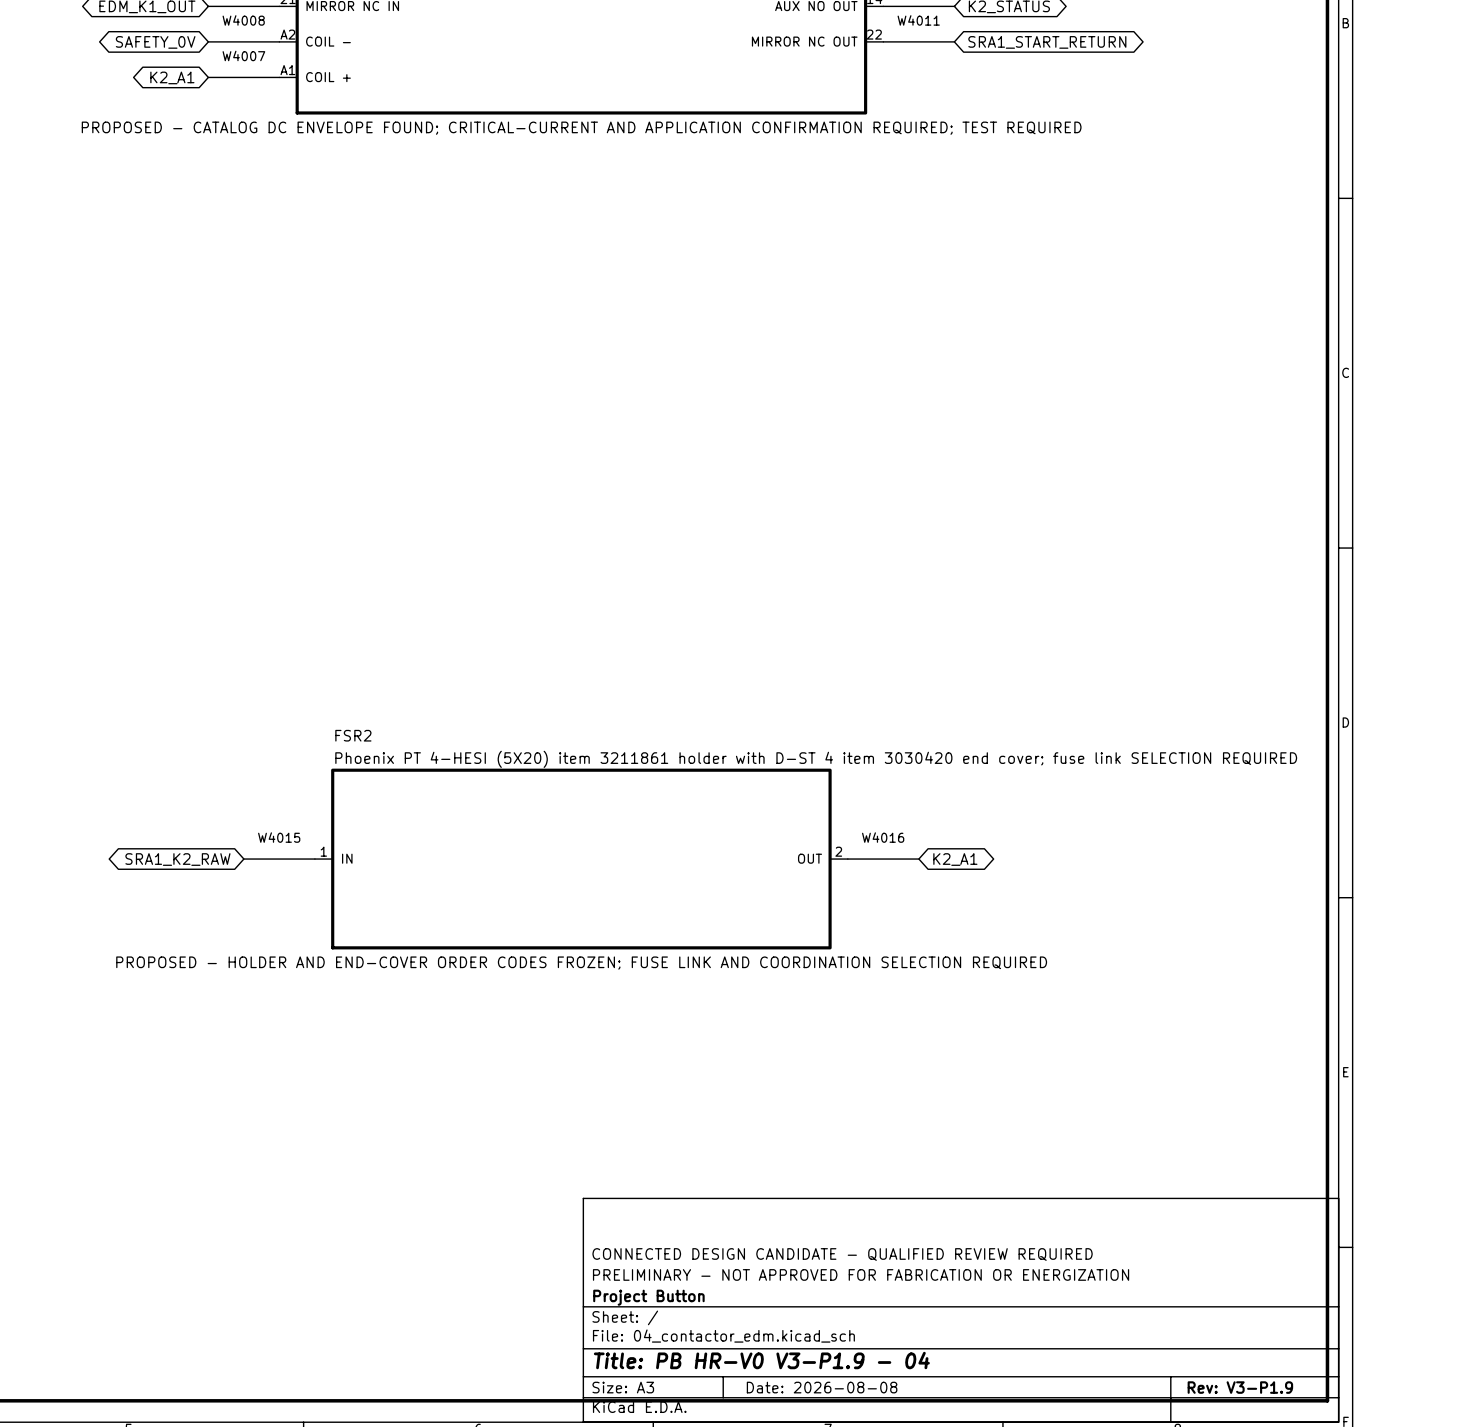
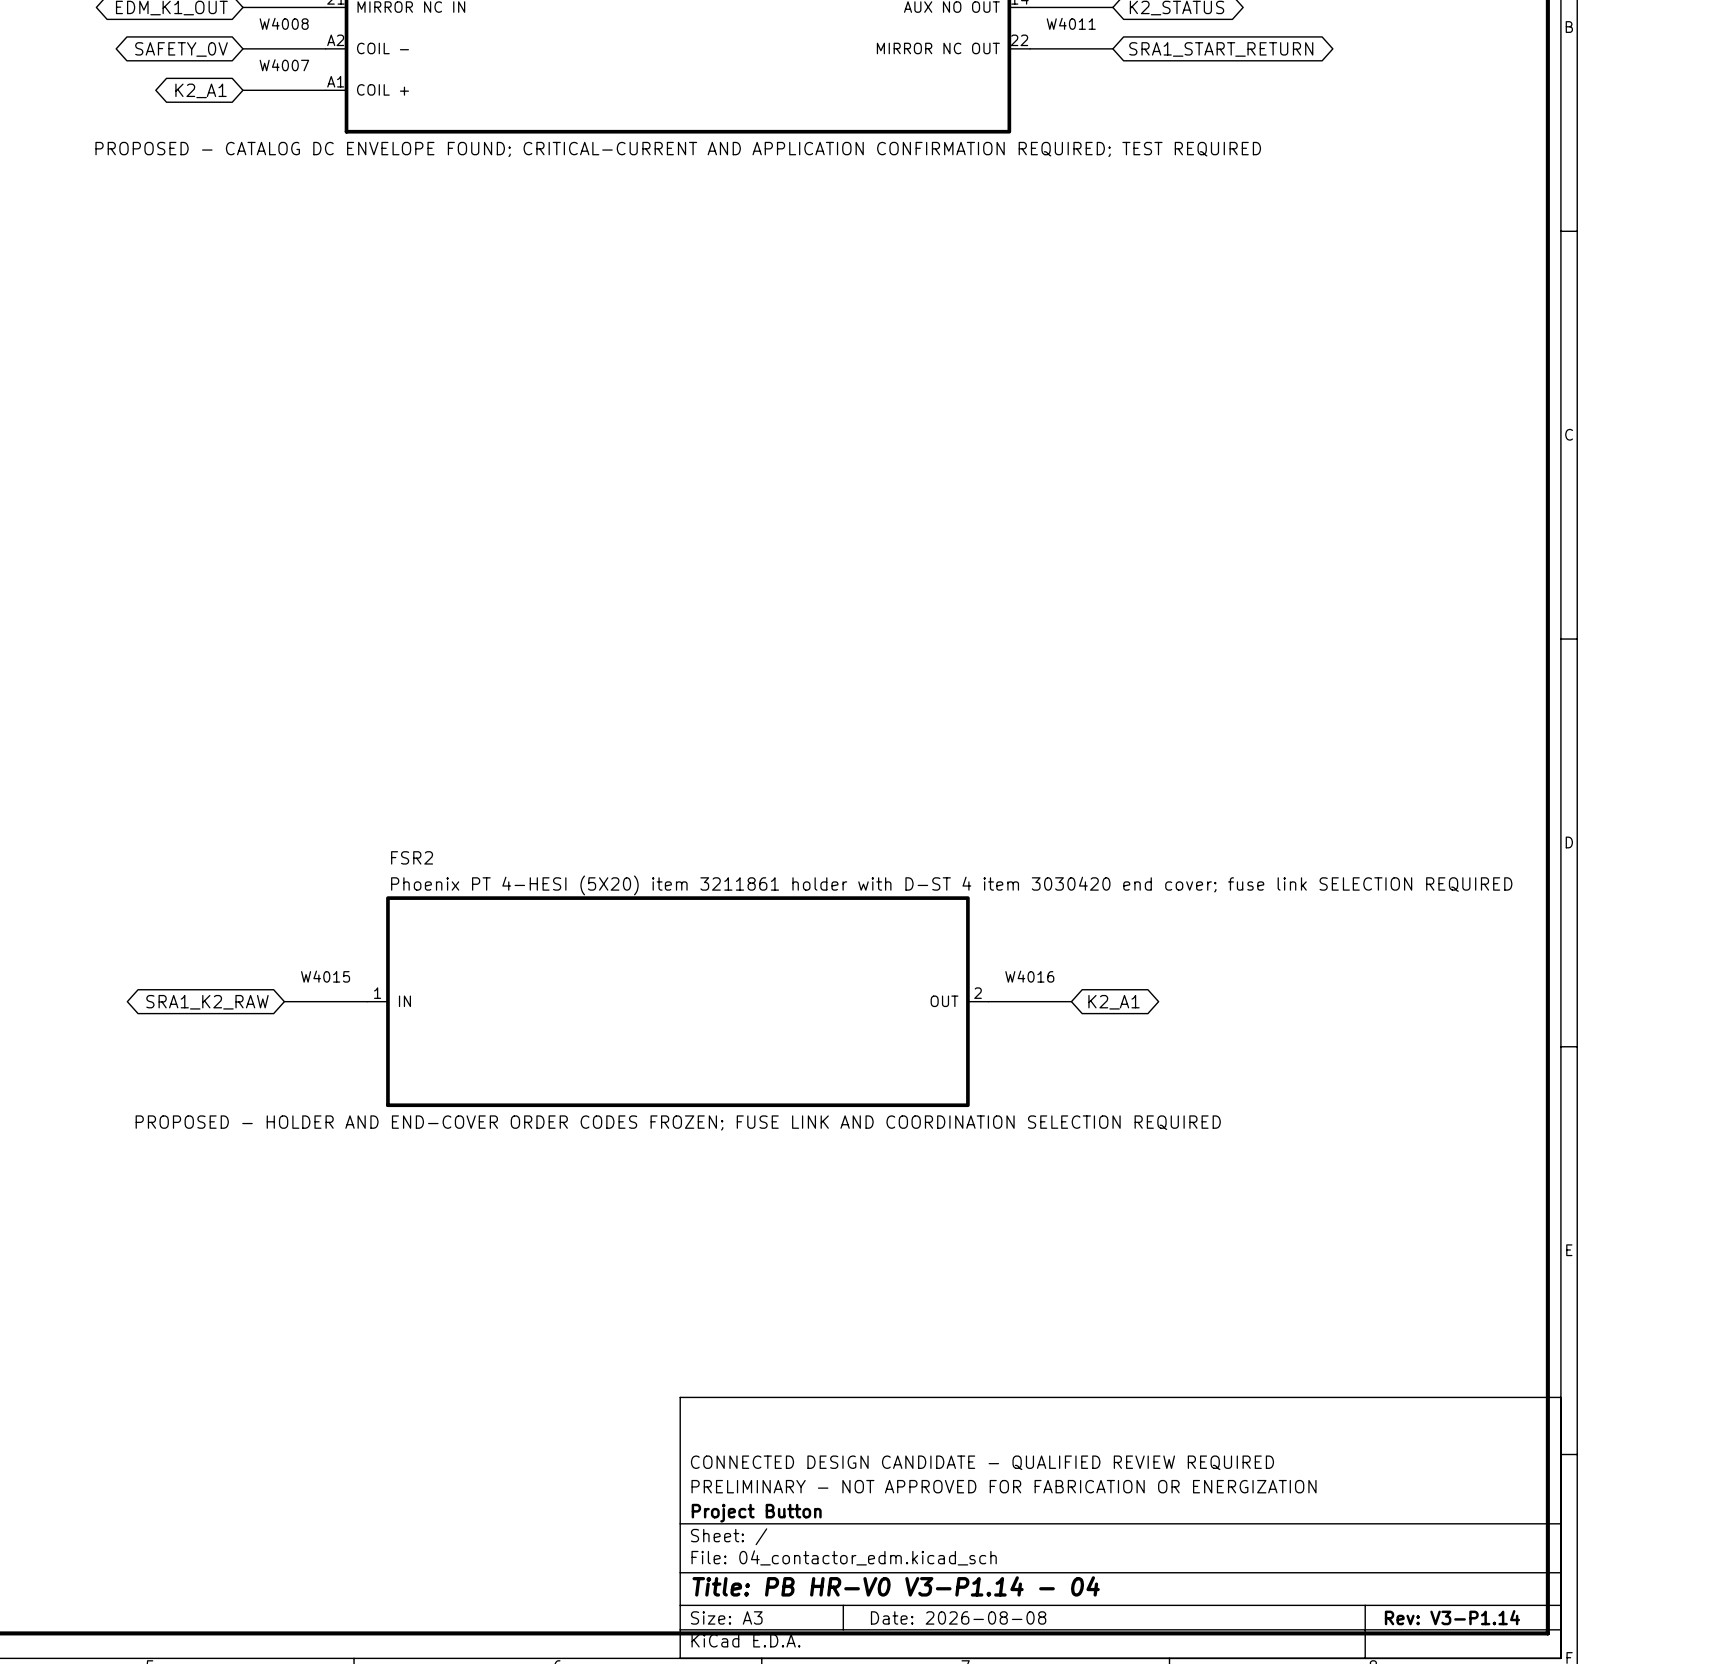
title block: Title: PB HR-V0 V3-P1.9 - 04 (761, 1360) -> Title: PB HR-V0 V3-P1.14 - 04 (896, 1586)
title block: Rev: V3-P1.9 (1240, 1387) -> Rev: V3-P1.14 (1452, 1617)

